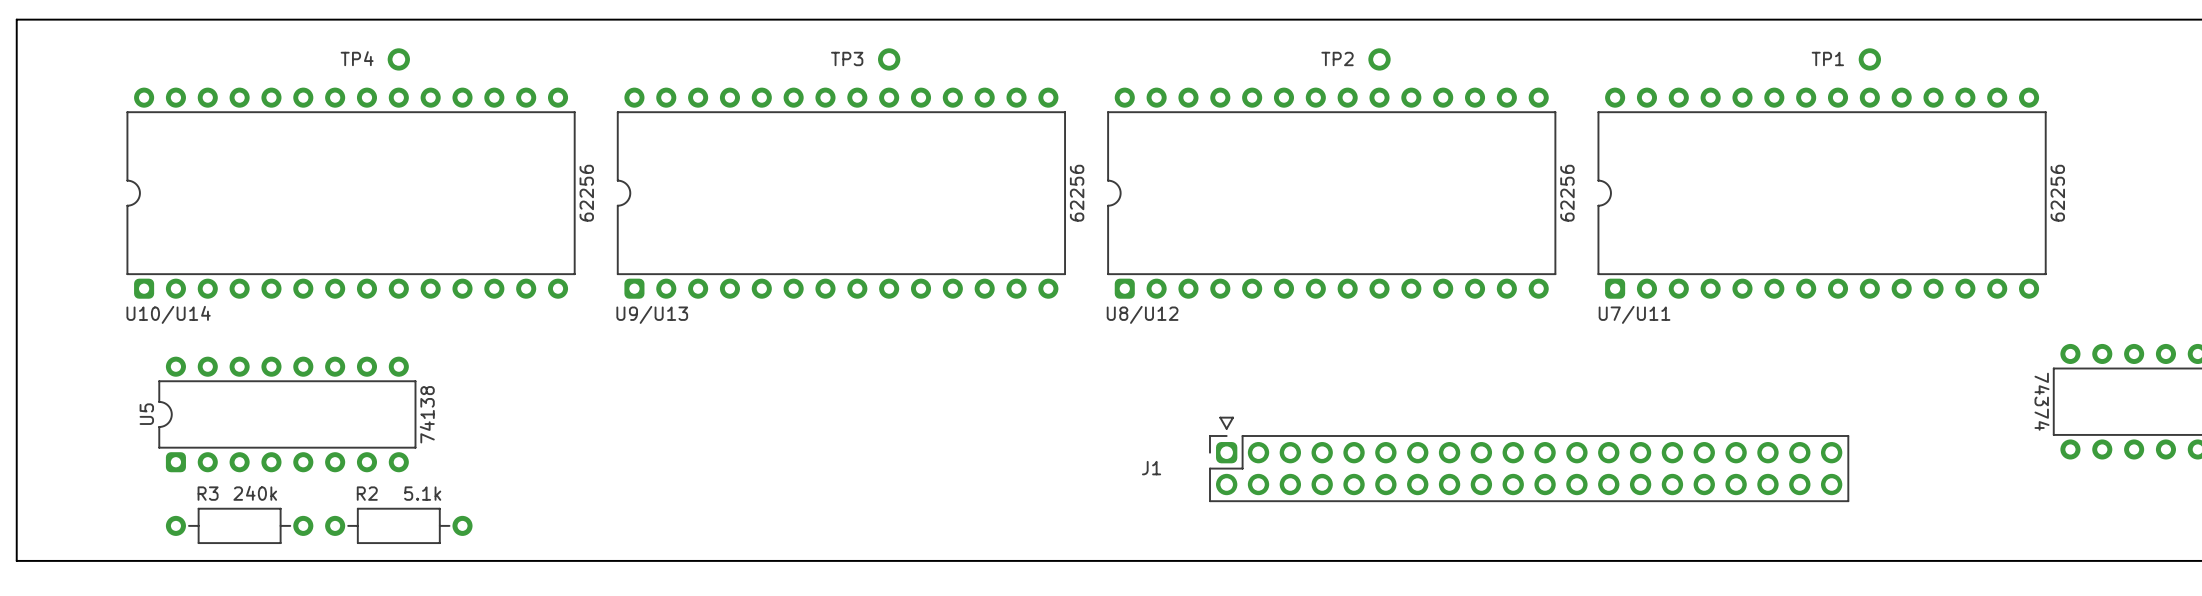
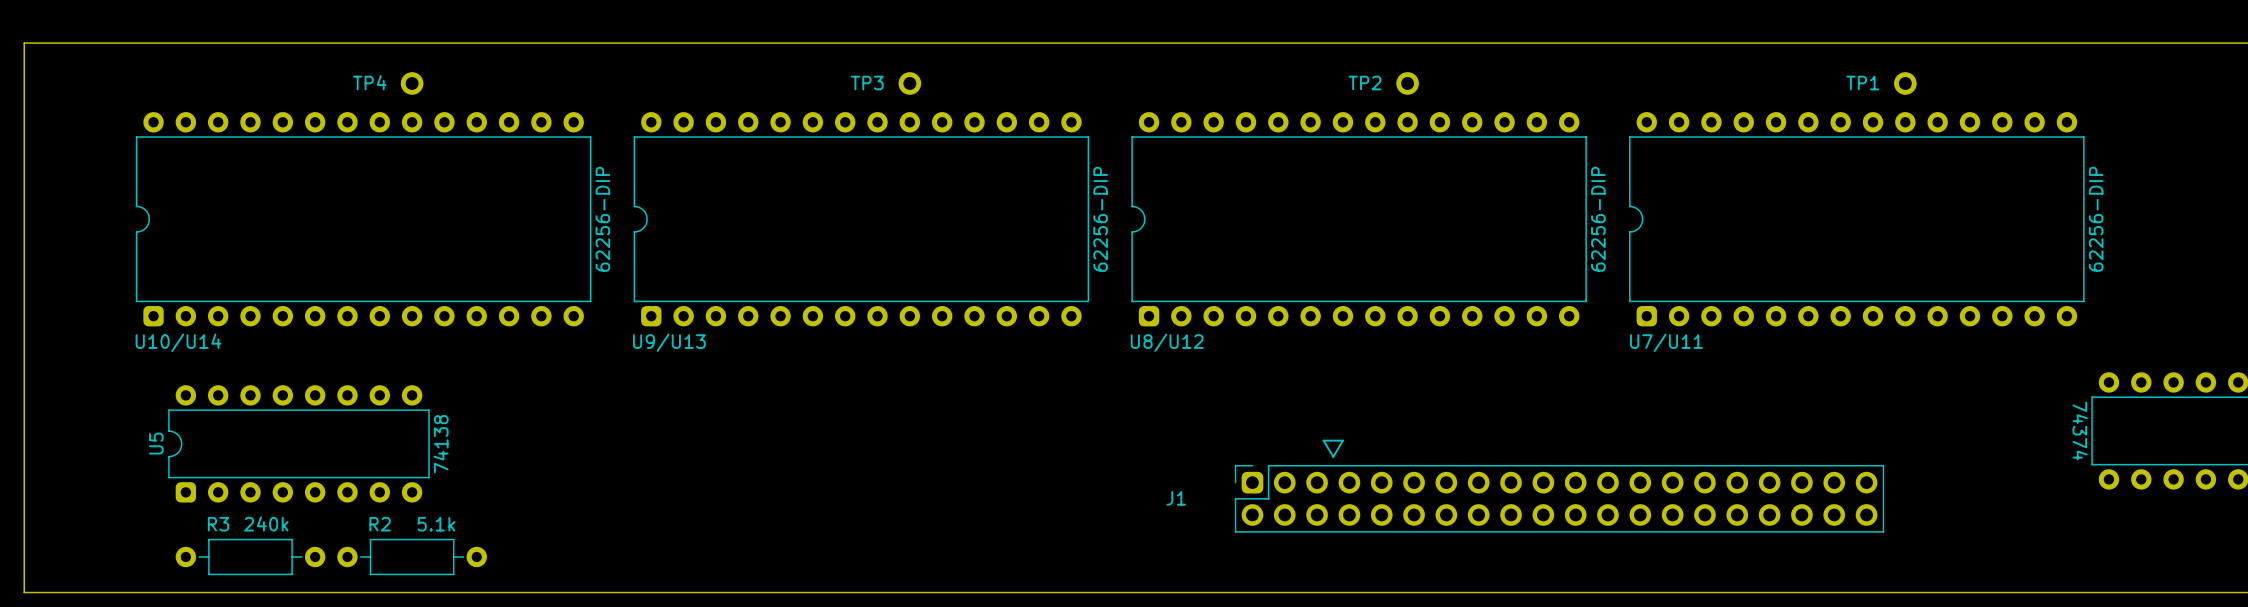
U10/U14 value: 62256 (586, 193) -> 62256-DIP (602, 219)
U9/U13 value: 62256 (1077, 193) -> 62256-DIP (1100, 219)
U8/U12 value: 62256 (1567, 193) -> 62256-DIP (1598, 219)
U7/U11 value: 62256 (2057, 193) -> 62256-DIP (2096, 219)
line: none -> (1323, 440) (1333, 456) (1342, 440) (1323, 440)
J1 footprint: [1209, 417, 1850, 502] -> [1234, 464, 1885, 533]

